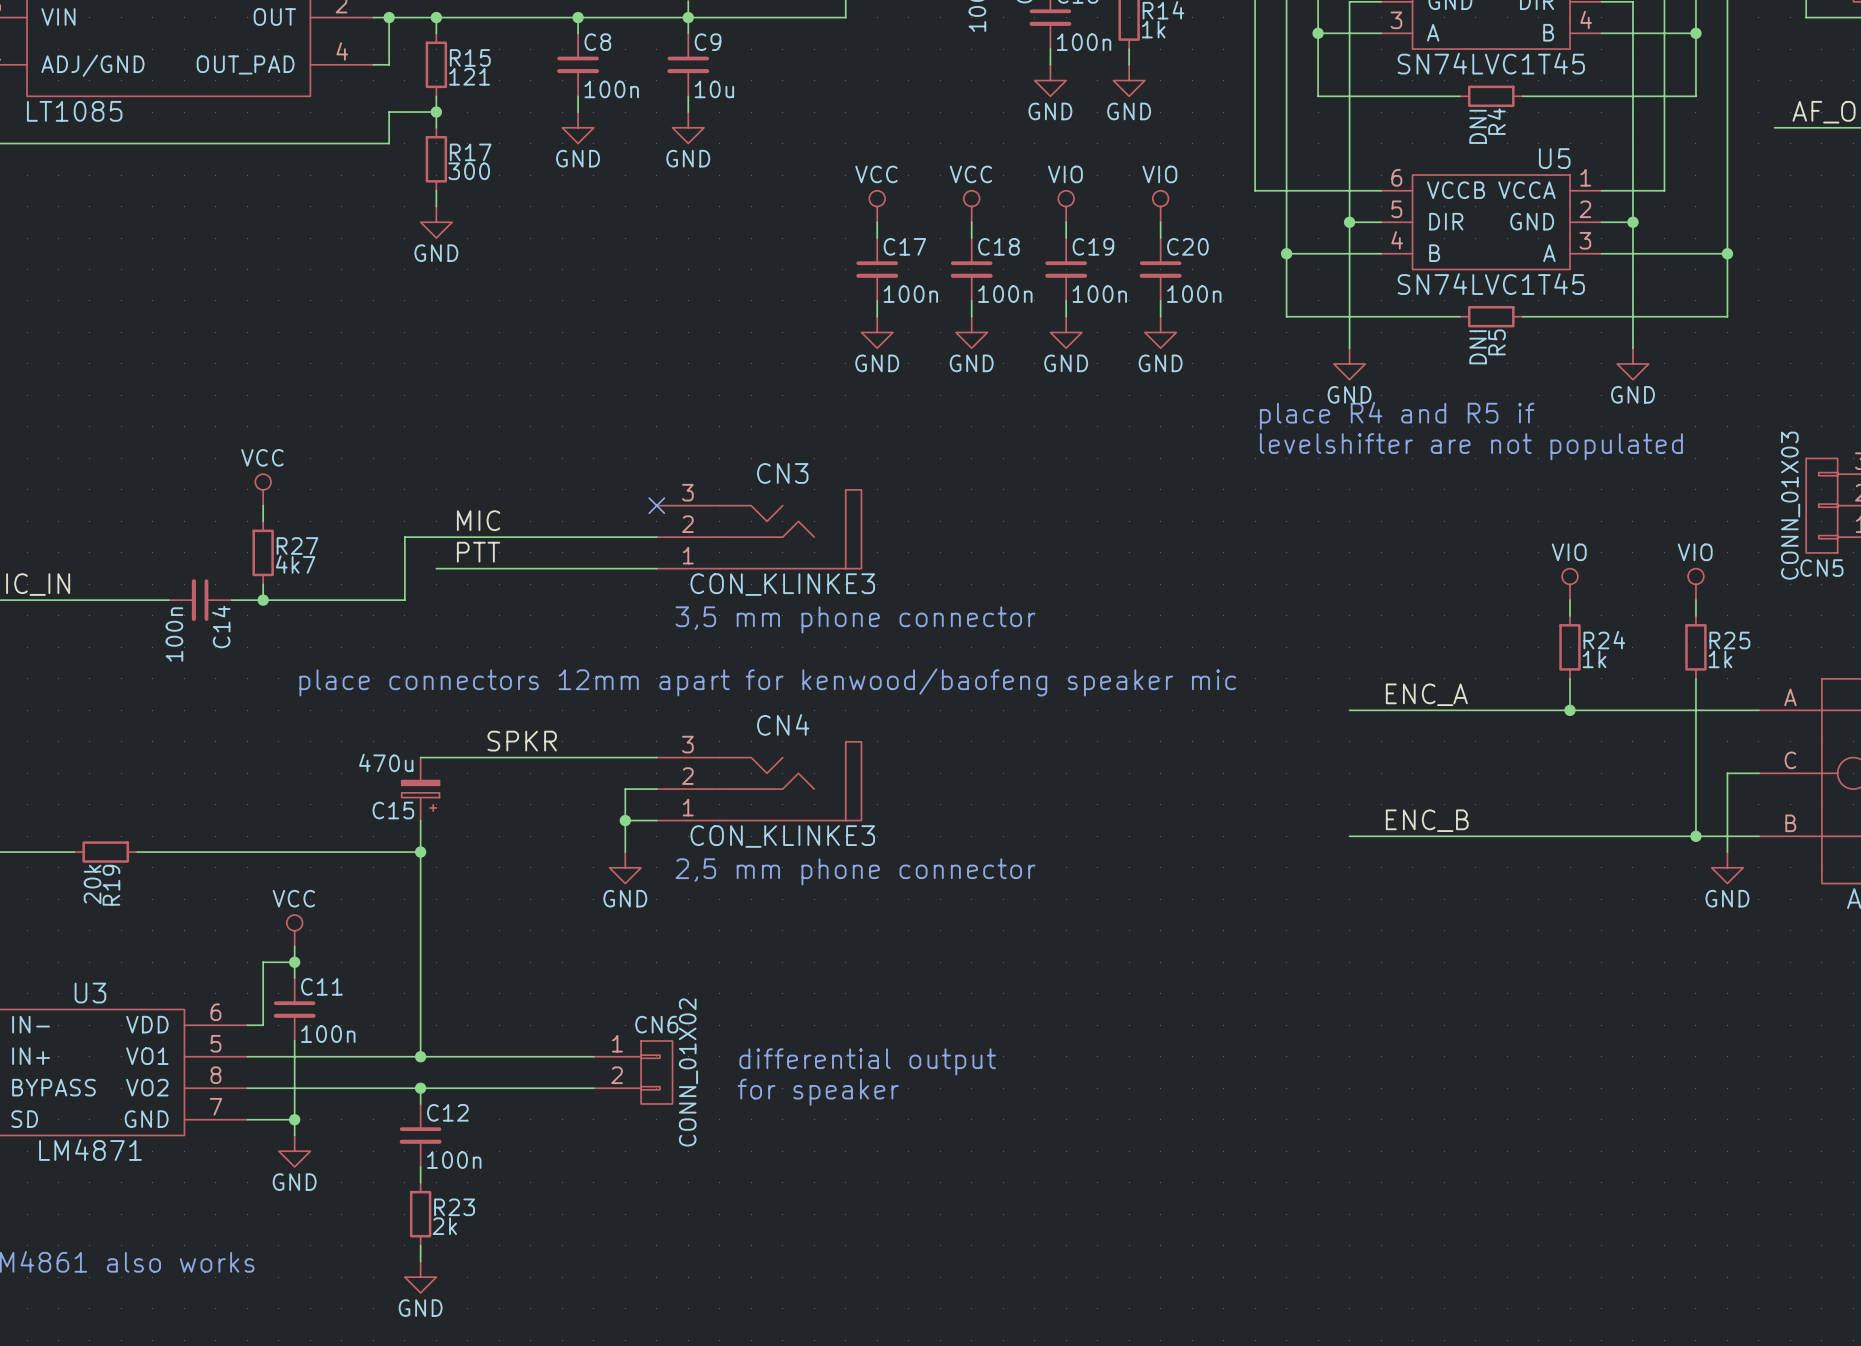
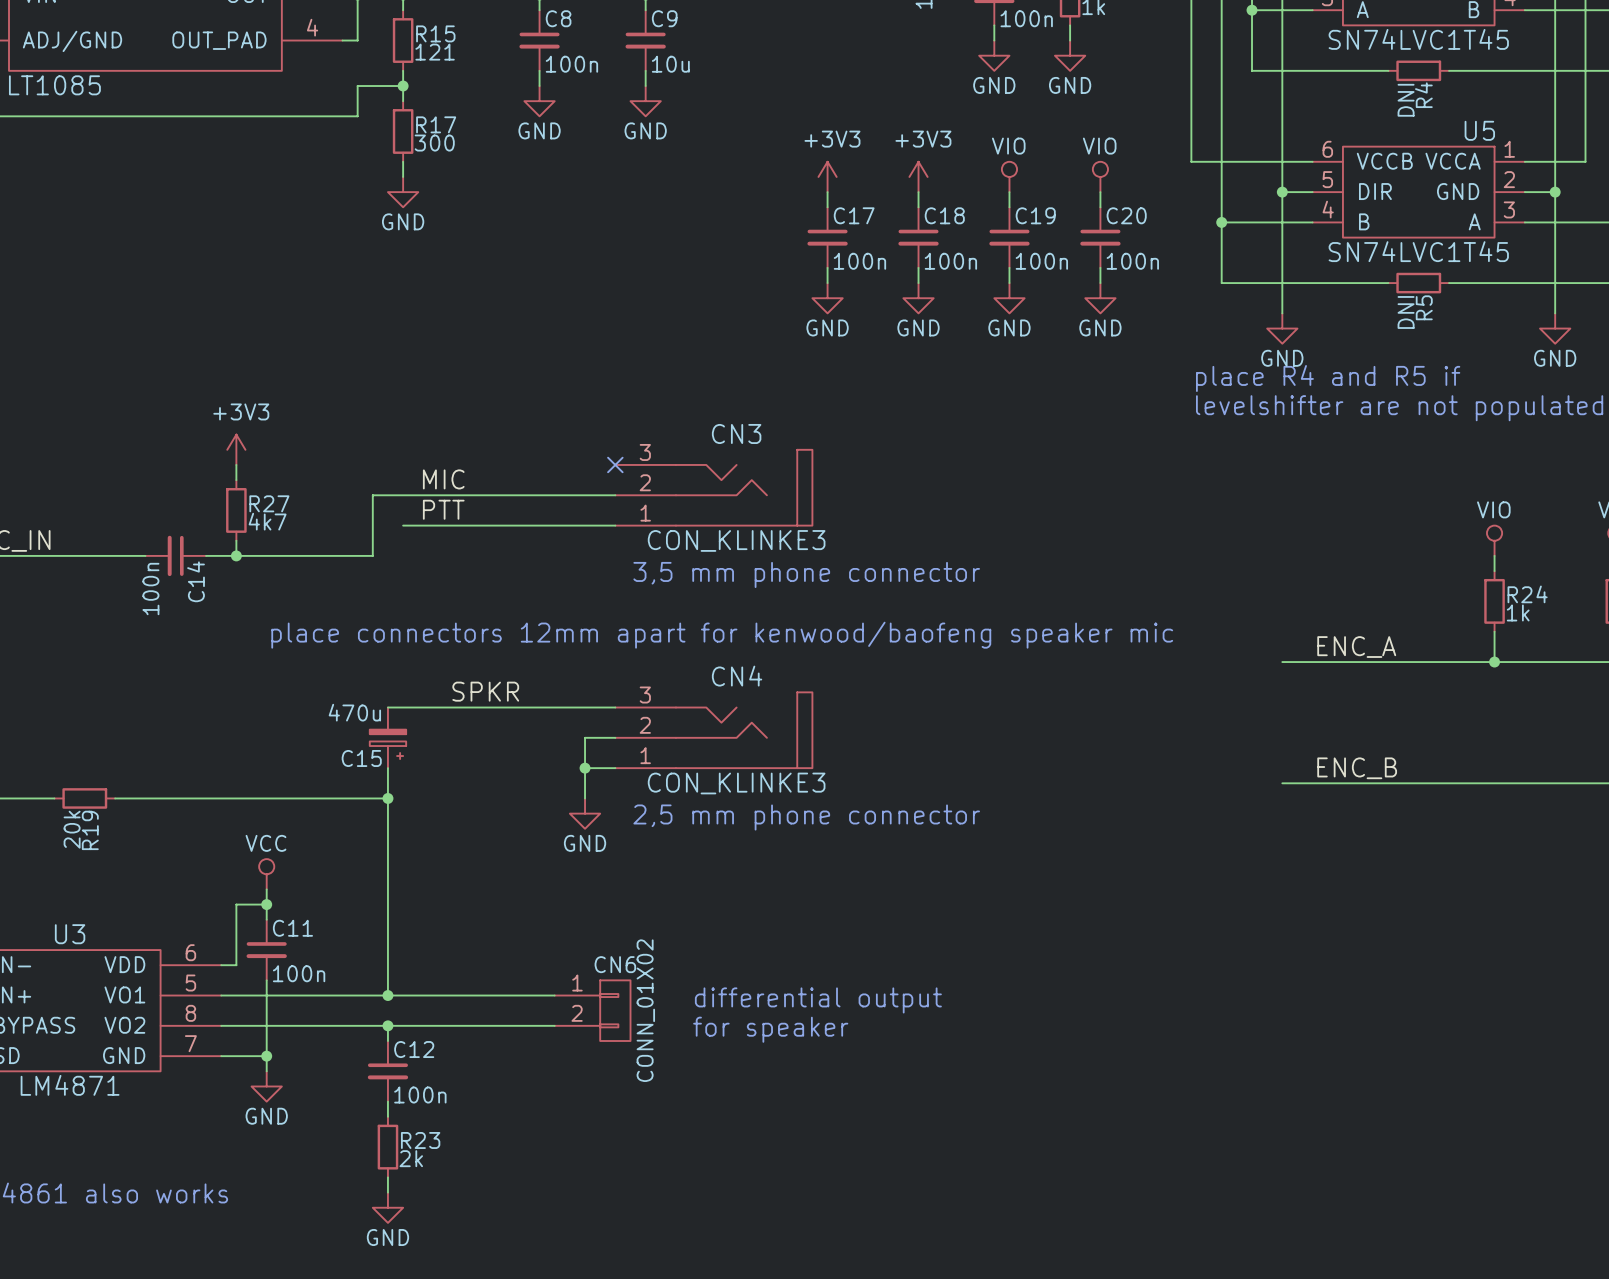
power symbol: VCC (877, 206) -> +3V3 (827, 176)
power symbol: VCC (971, 206) -> +3V3 (918, 176)
power symbol: VCC (263, 489) -> +3V3 (236, 449)

